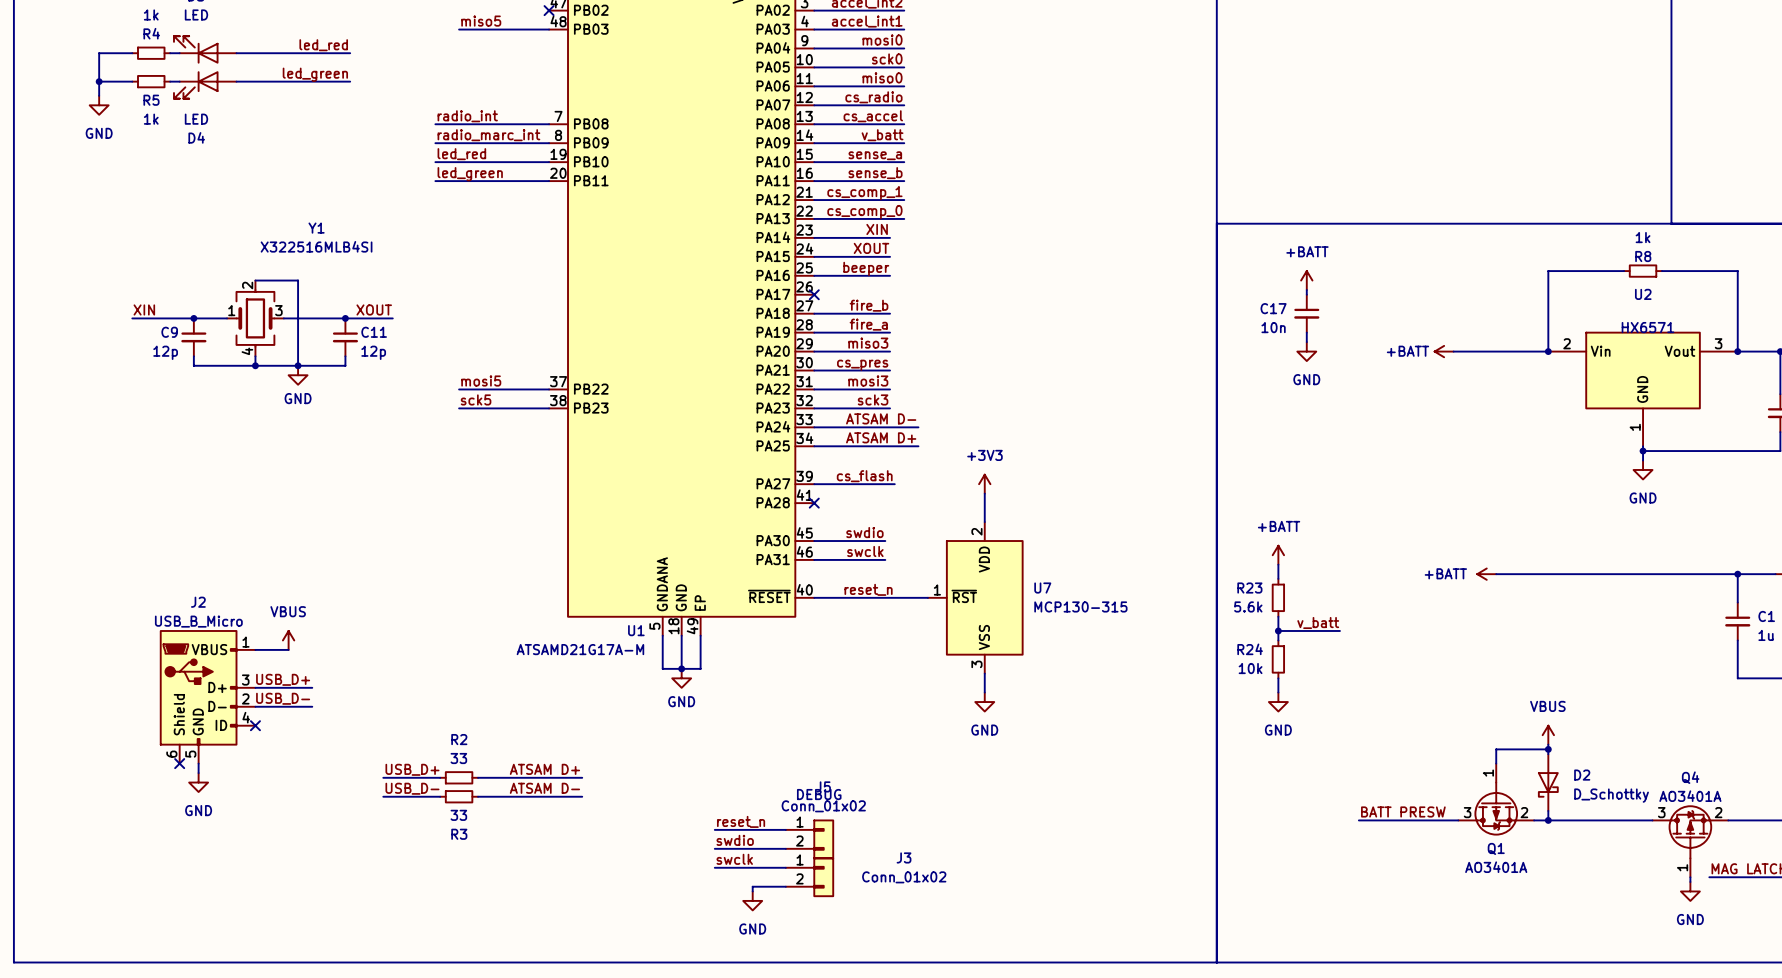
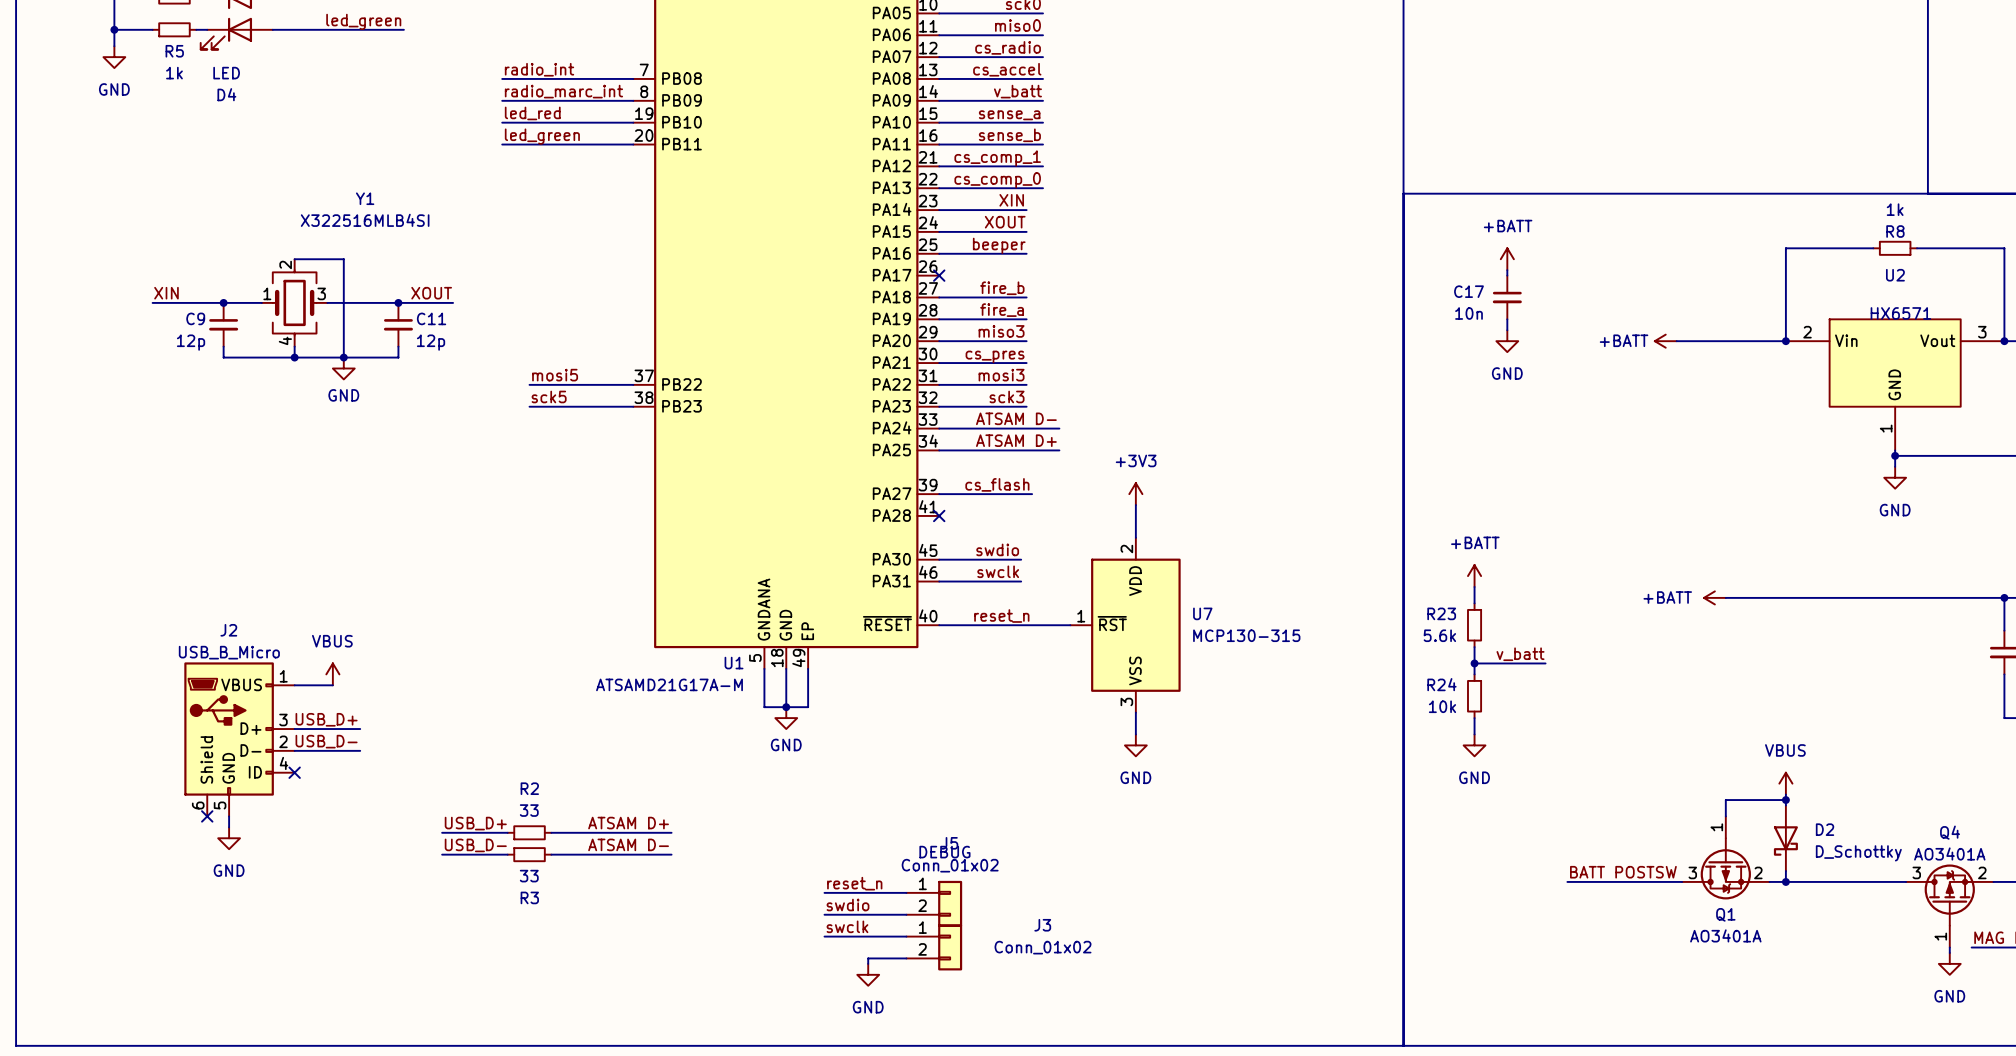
label: BATT PRESW (1403, 811) -> BATT POSTSW (1623, 872)

